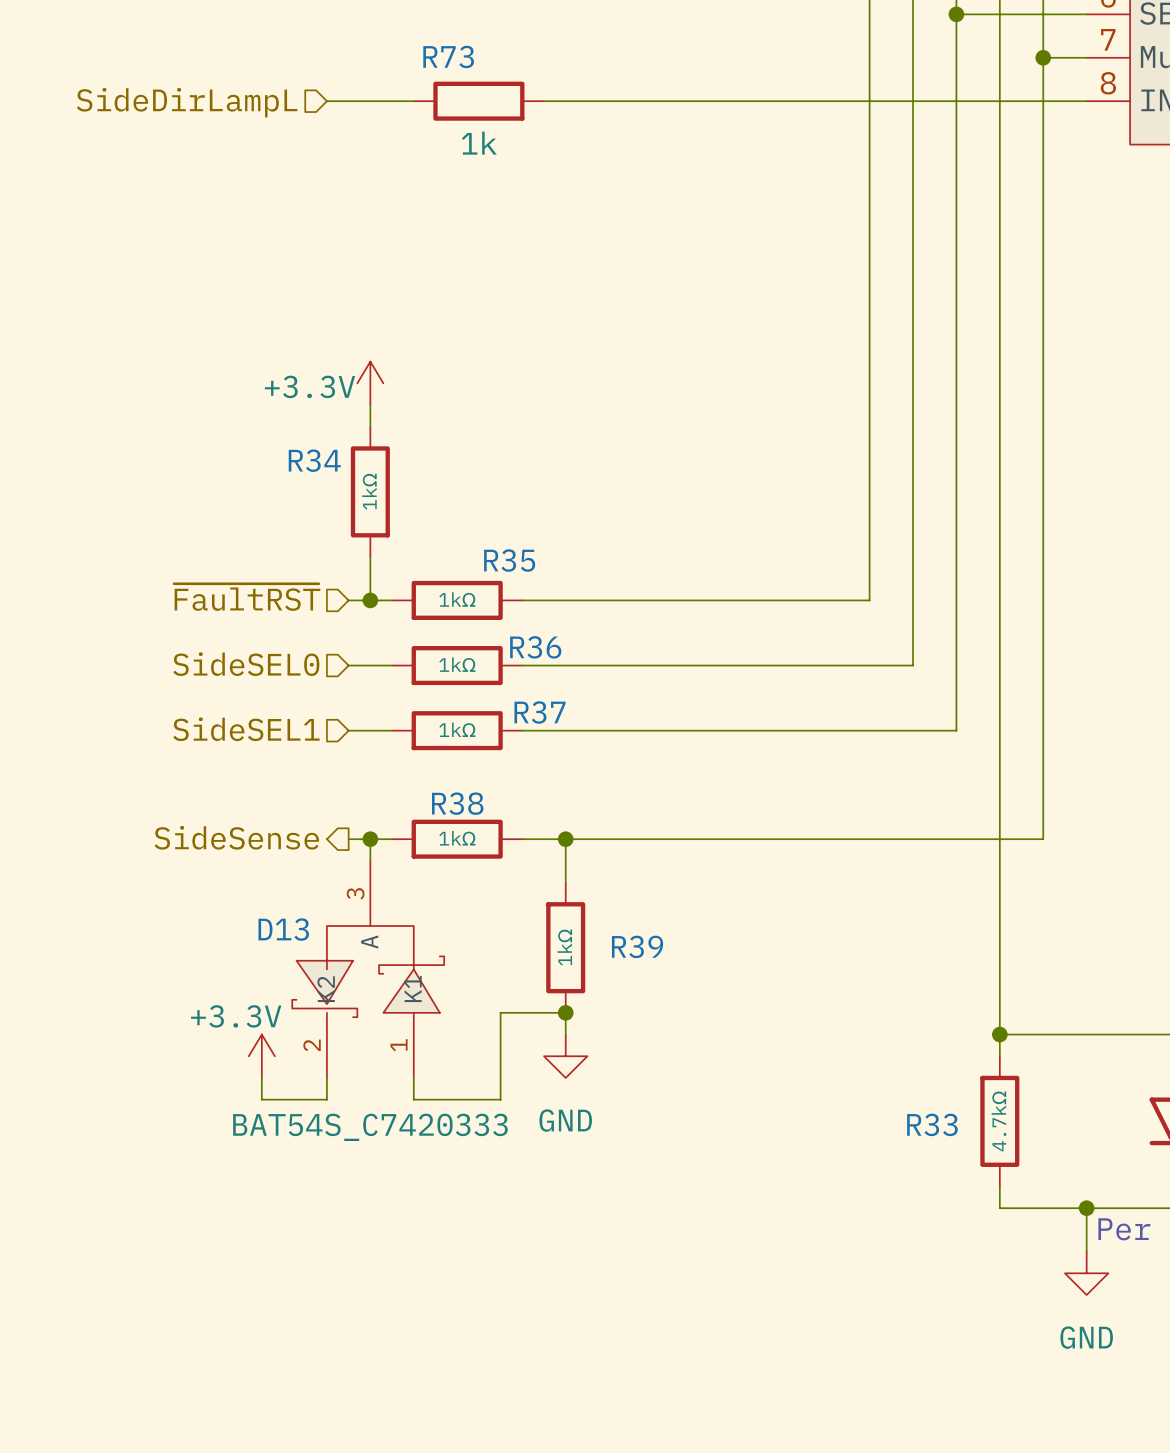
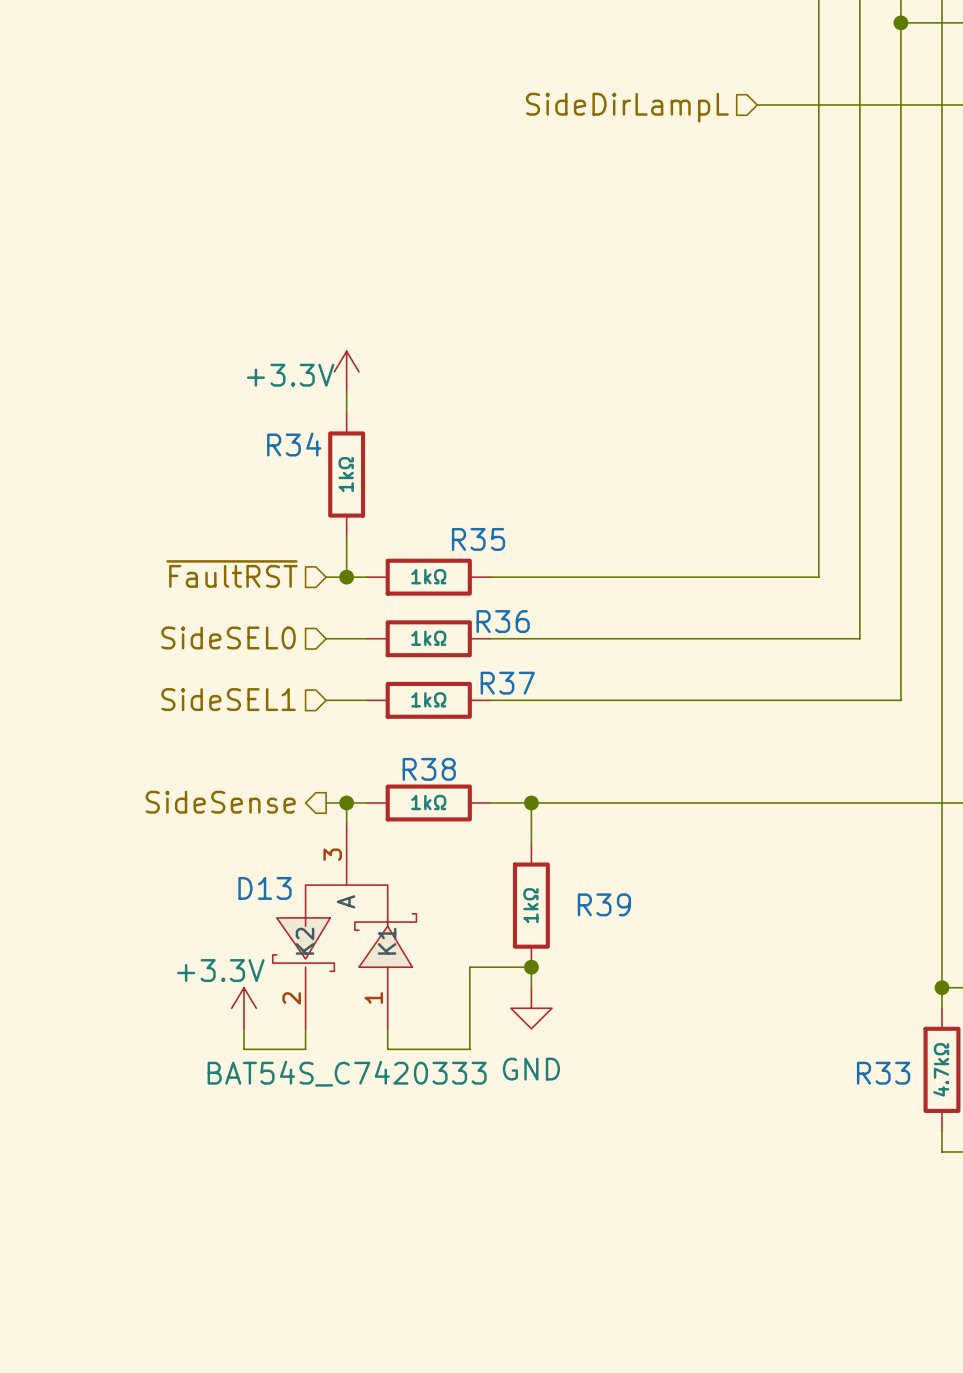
wire: (326, 101) (413, 101) -> none
R73: 1k (478, 101) -> none
wire: (544, 101) (804, 101) -> none
hierarchical label: SideDirLampL (187, 102) -> none
hierarchical label: none -> SideDirLampL (627, 107)

